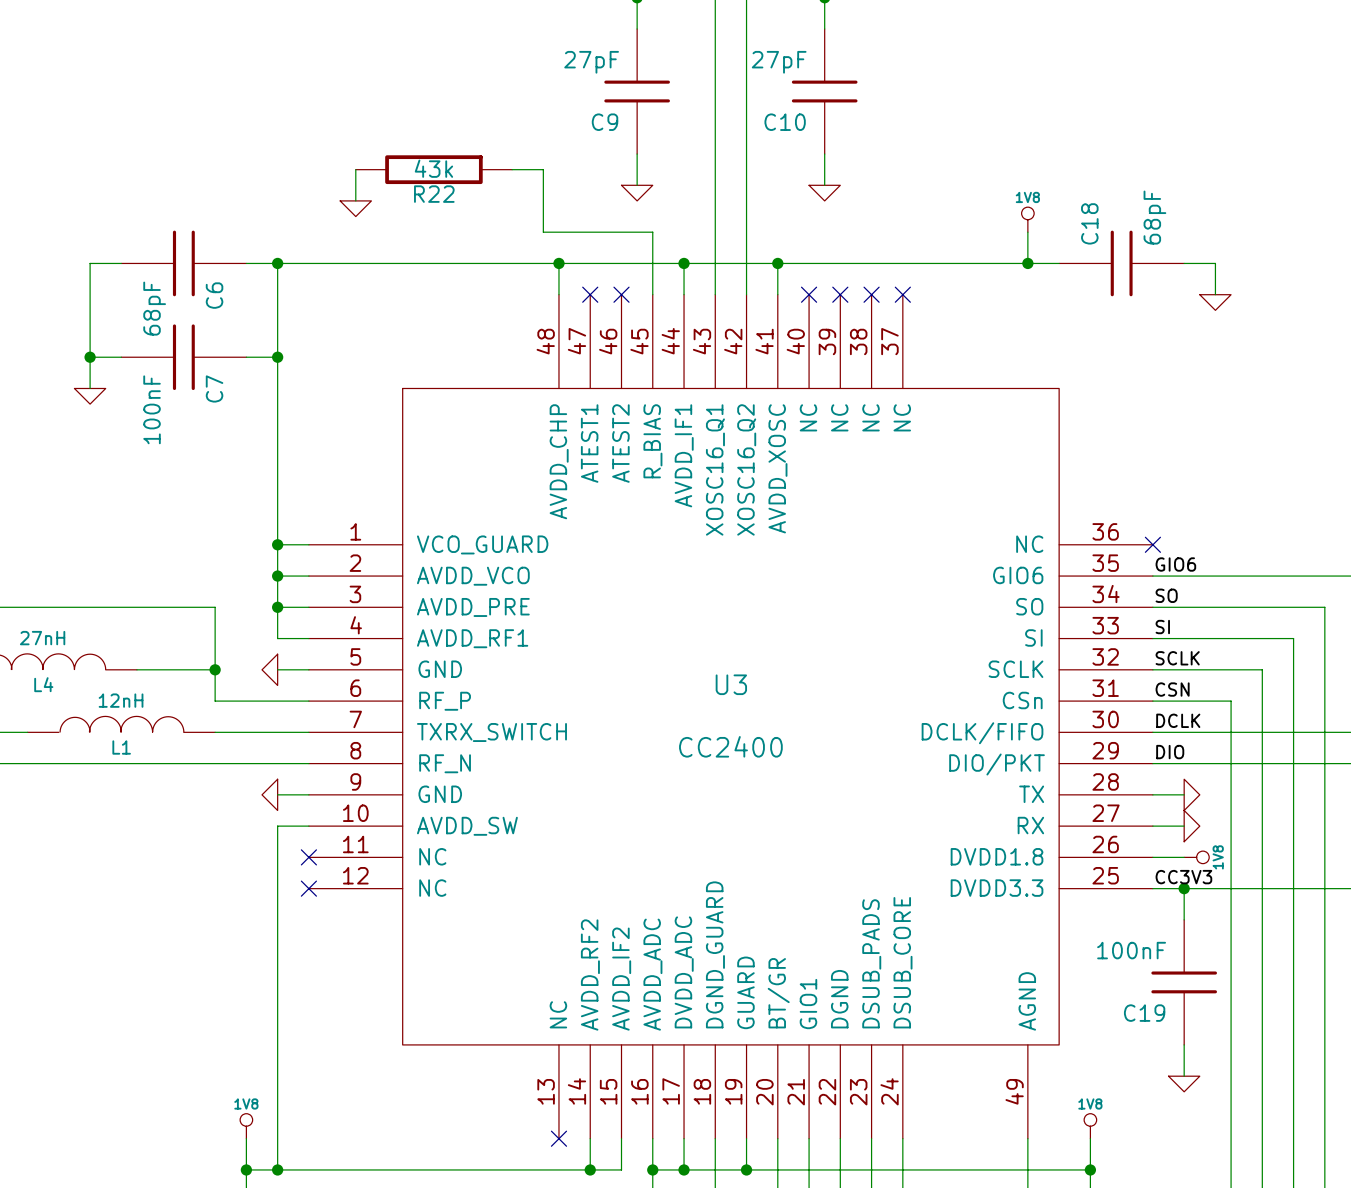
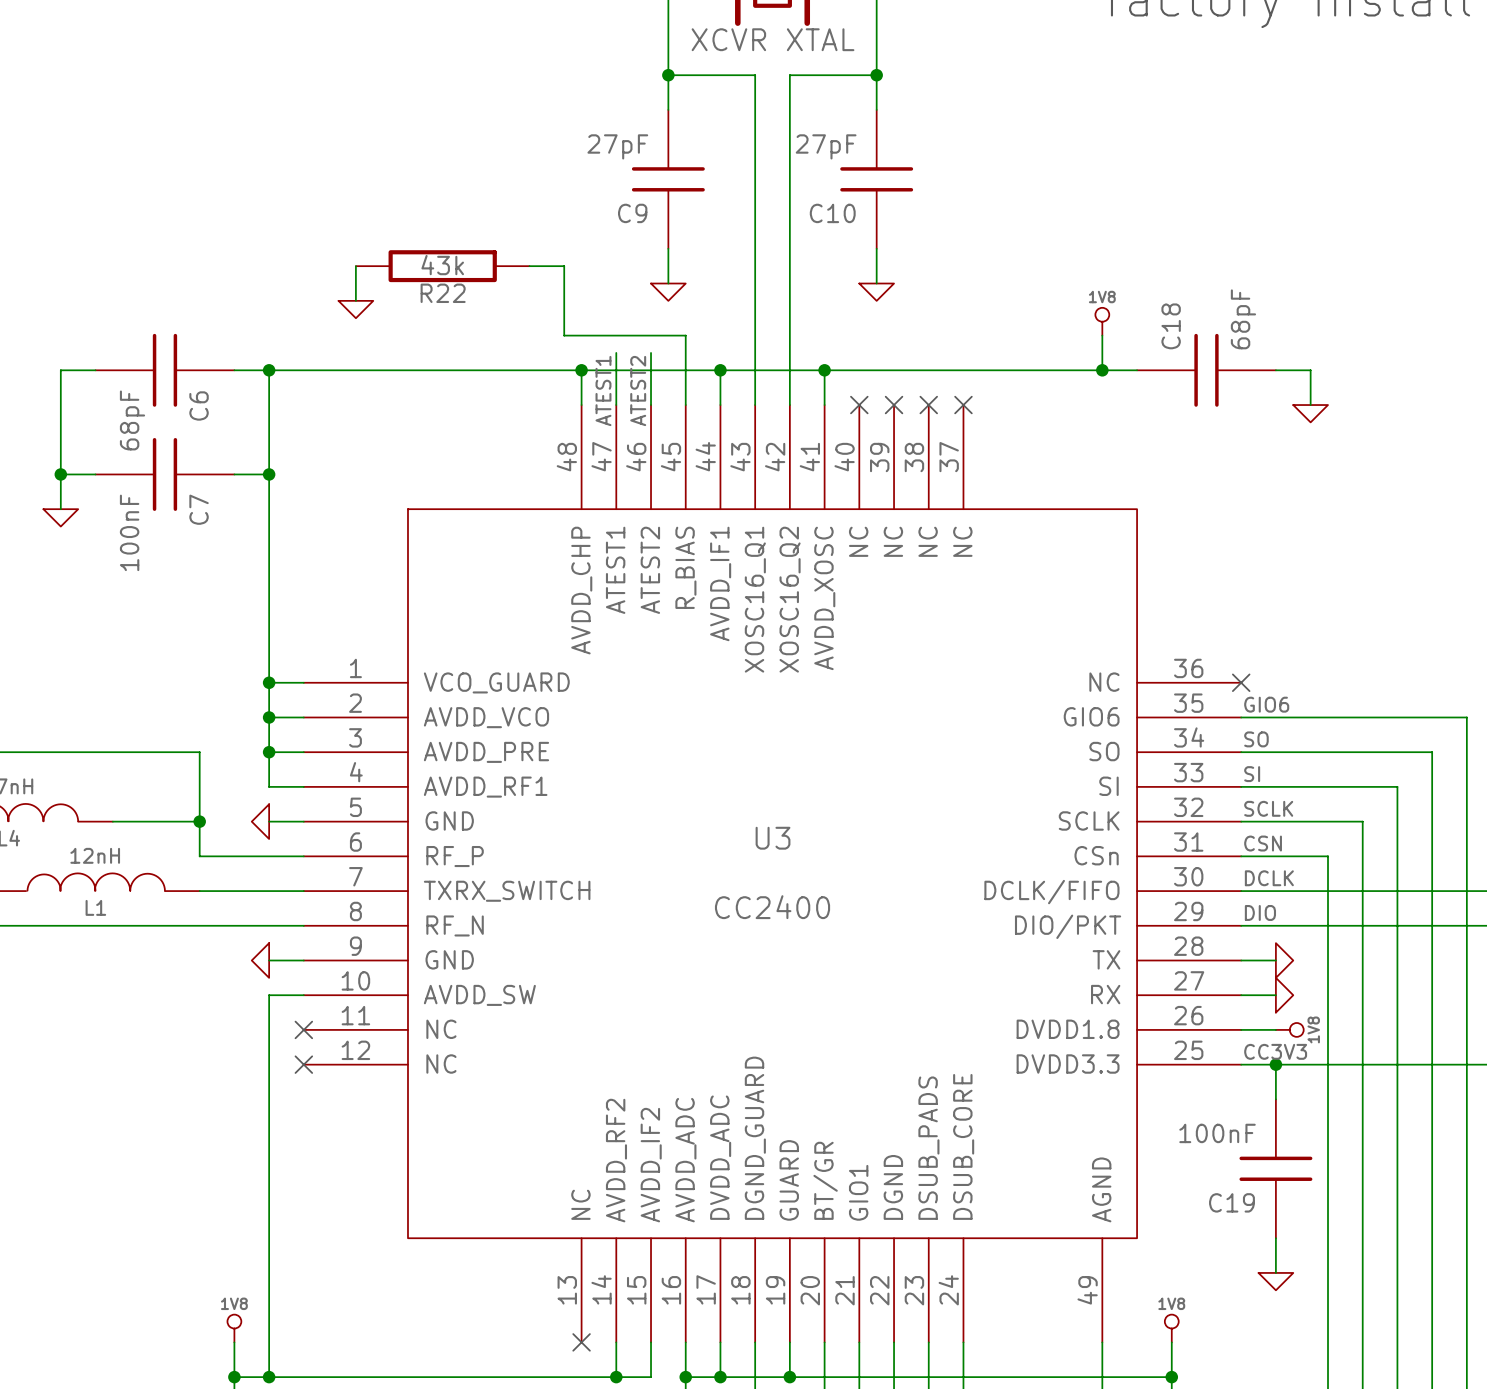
wire: none -> (616, 352) (616, 405)
wire: none -> (651, 352) (651, 405)
label: none -> ATEST1 (603, 391)
label: none -> ATEST2 (638, 391)
no-connect mark: (590, 294) -> none
no-connect mark: (621, 294) -> none

